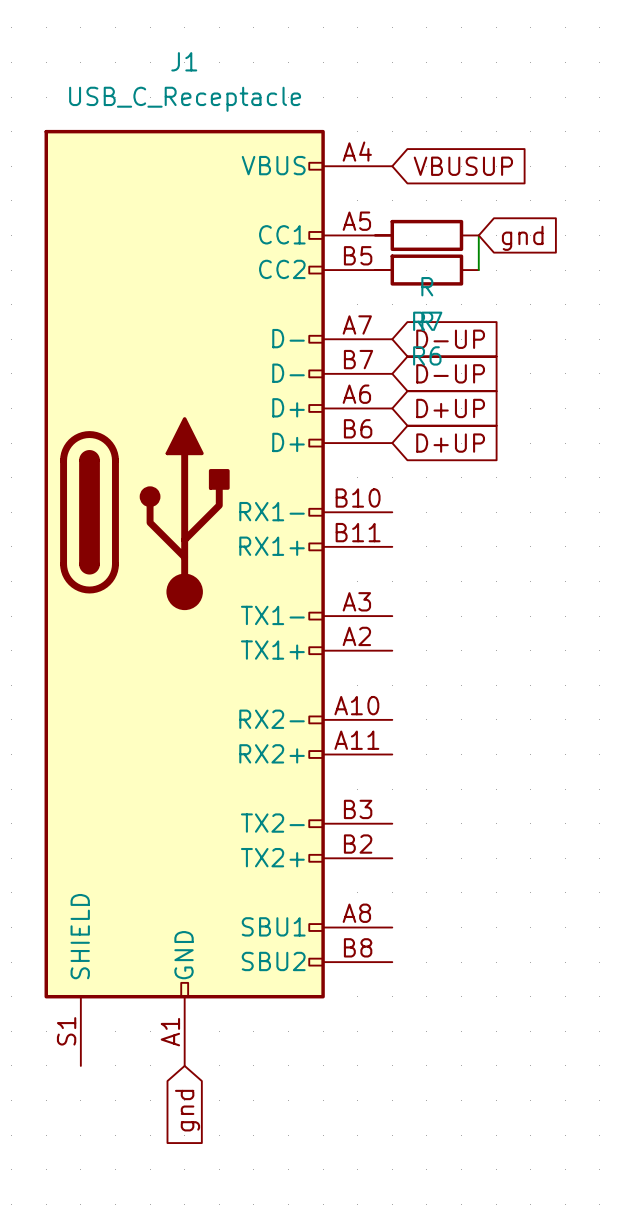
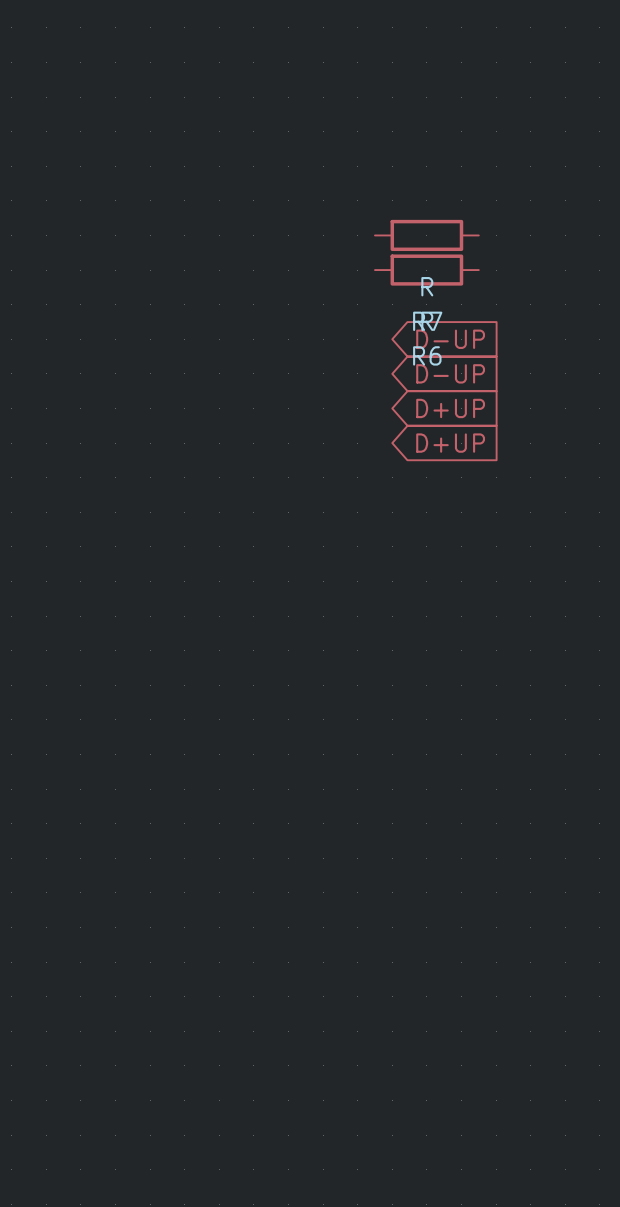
global label: VBUSUP (463, 166) -> none
wire: (478, 235) (478, 270) -> none
global label: gnd (522, 238) -> none
J1: USB_C_Receptacle (218, 597) -> none
global label: gnd (187, 1110) -> none

